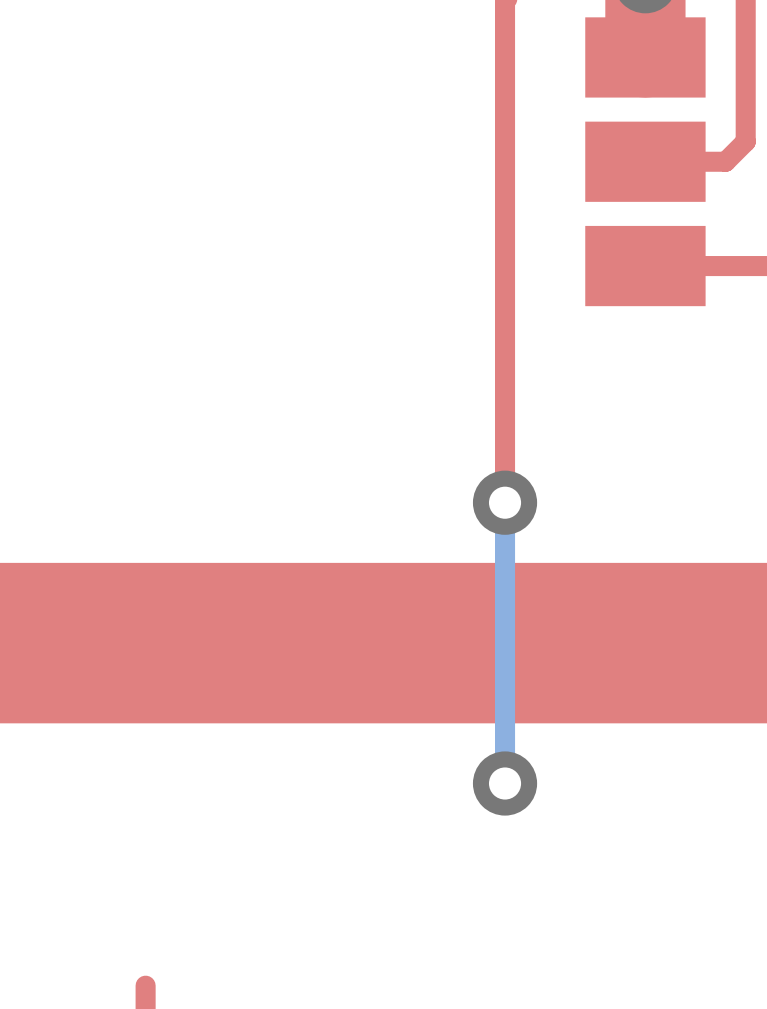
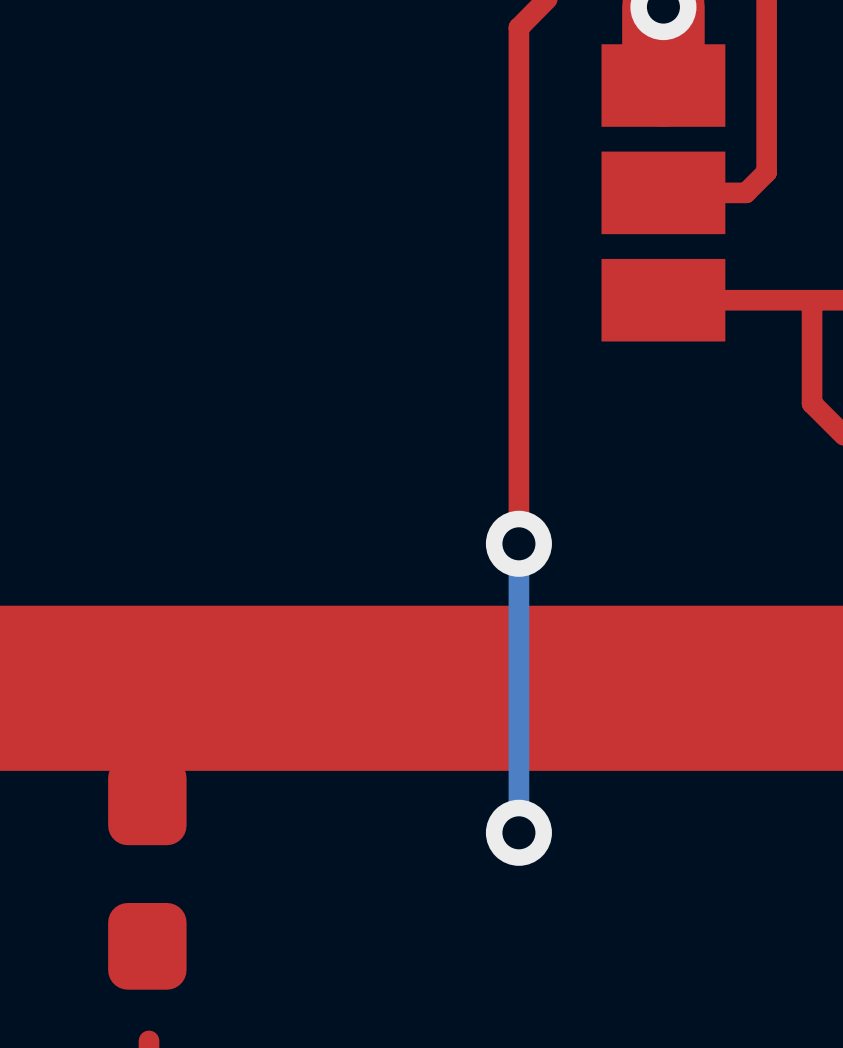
part: none -> (147, 874)

